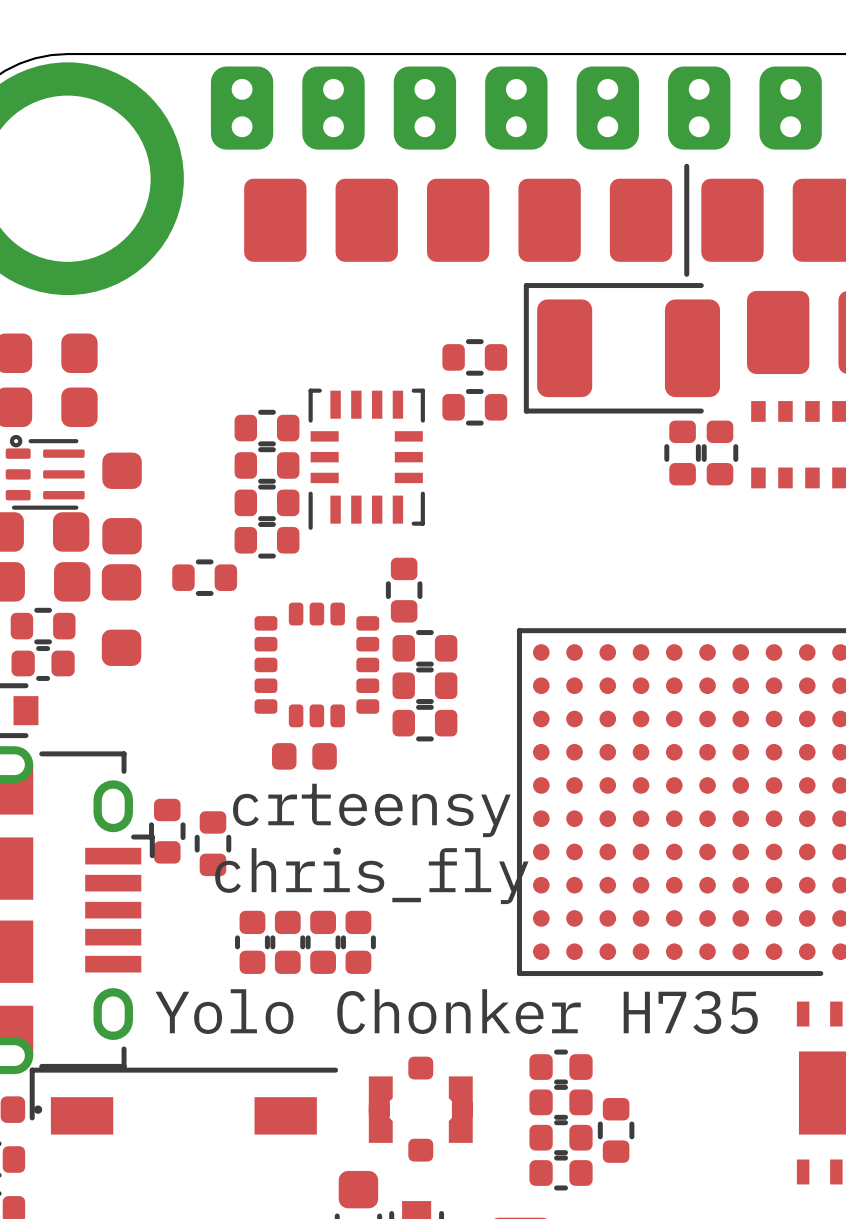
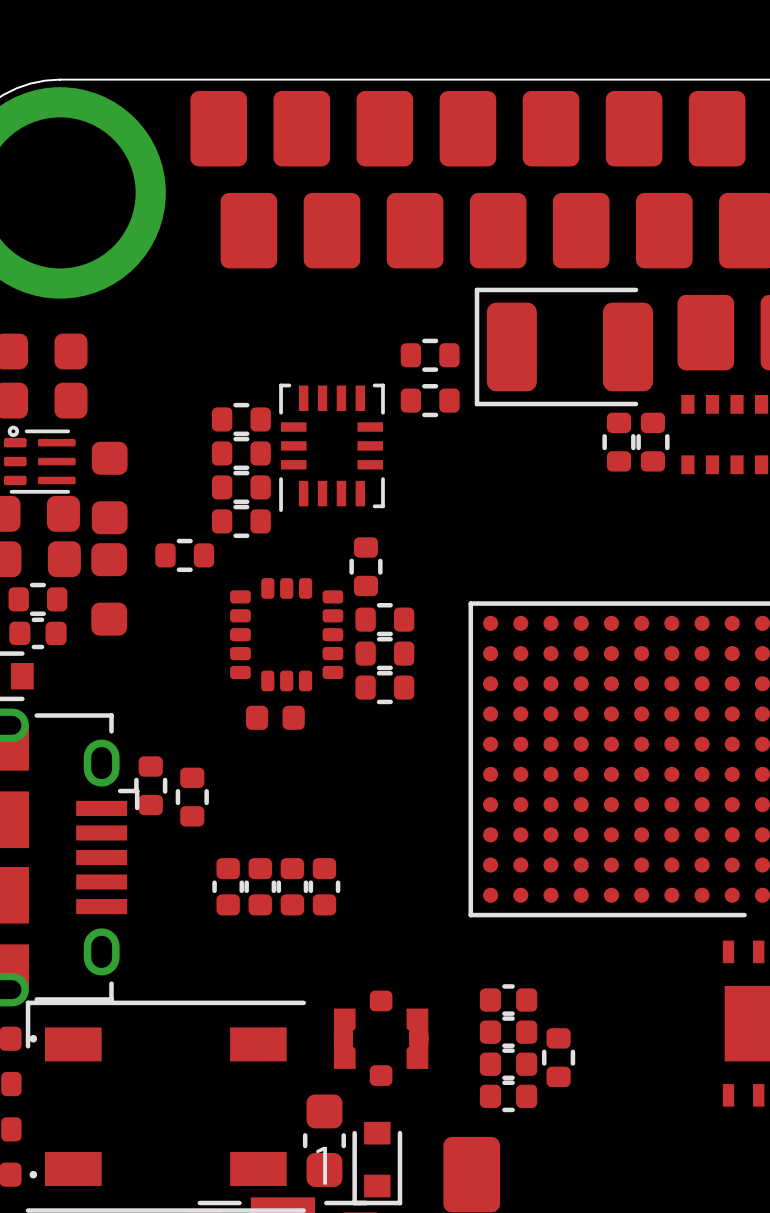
part footprint: [210, 66, 274, 150] -> [190, 90, 248, 167]
part footprint: [302, 66, 365, 150] -> [273, 90, 331, 167]
part footprint: [393, 66, 457, 150] -> [356, 90, 414, 167]
part footprint: [485, 66, 548, 150] -> [439, 90, 497, 167]
part footprint: [576, 66, 639, 150] -> [522, 90, 580, 167]
part footprint: [668, 66, 731, 150] -> [605, 90, 663, 167]
part footprint: [759, 66, 822, 150] -> [688, 90, 746, 167]
line: (686, 166) (686, 274) -> none
text: crteensy (371, 810) -> none
text: chris_fly (371, 875) -> none
text: Yolo Chonker H735 (456, 1011) -> none

